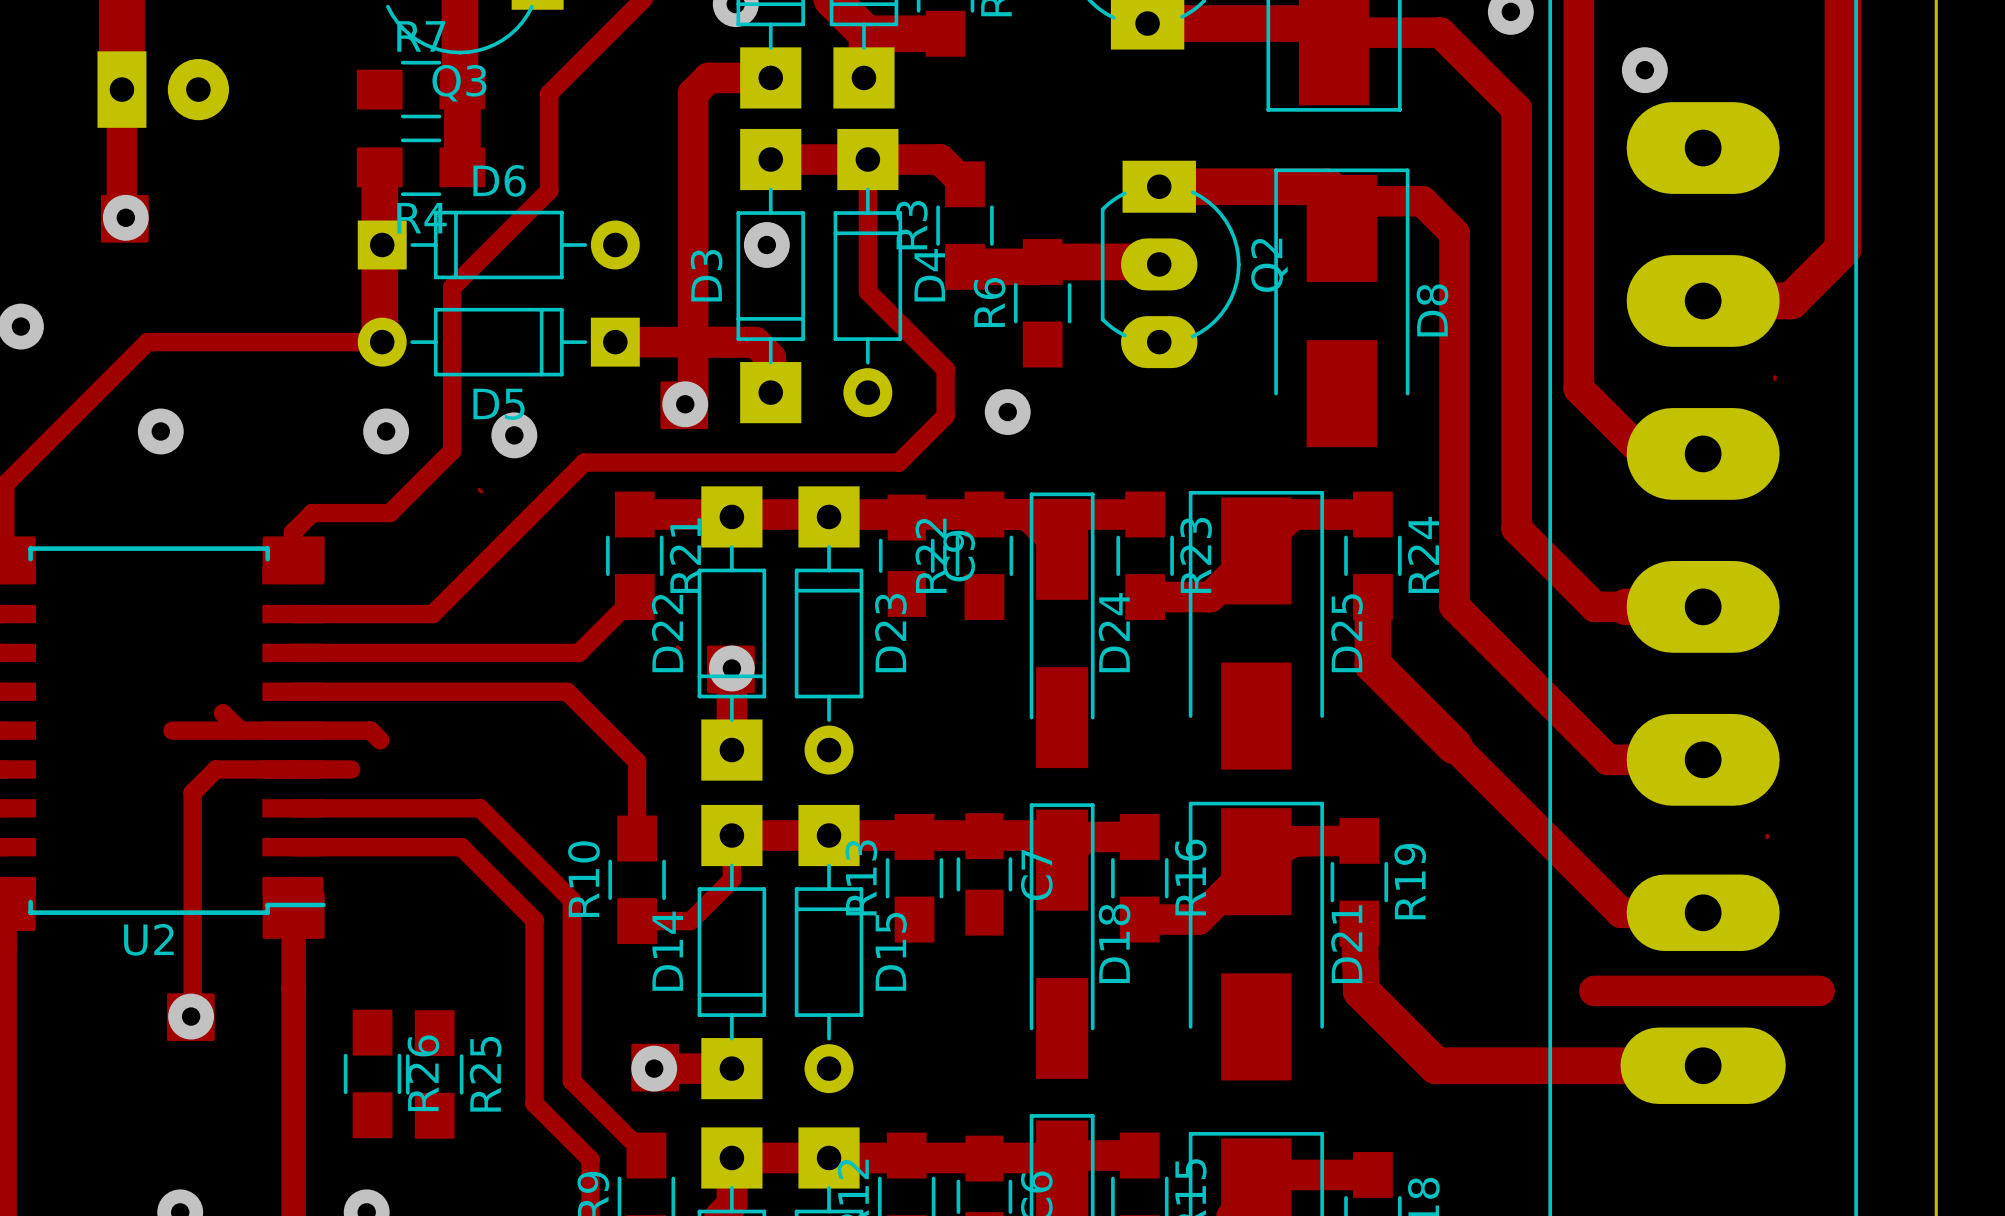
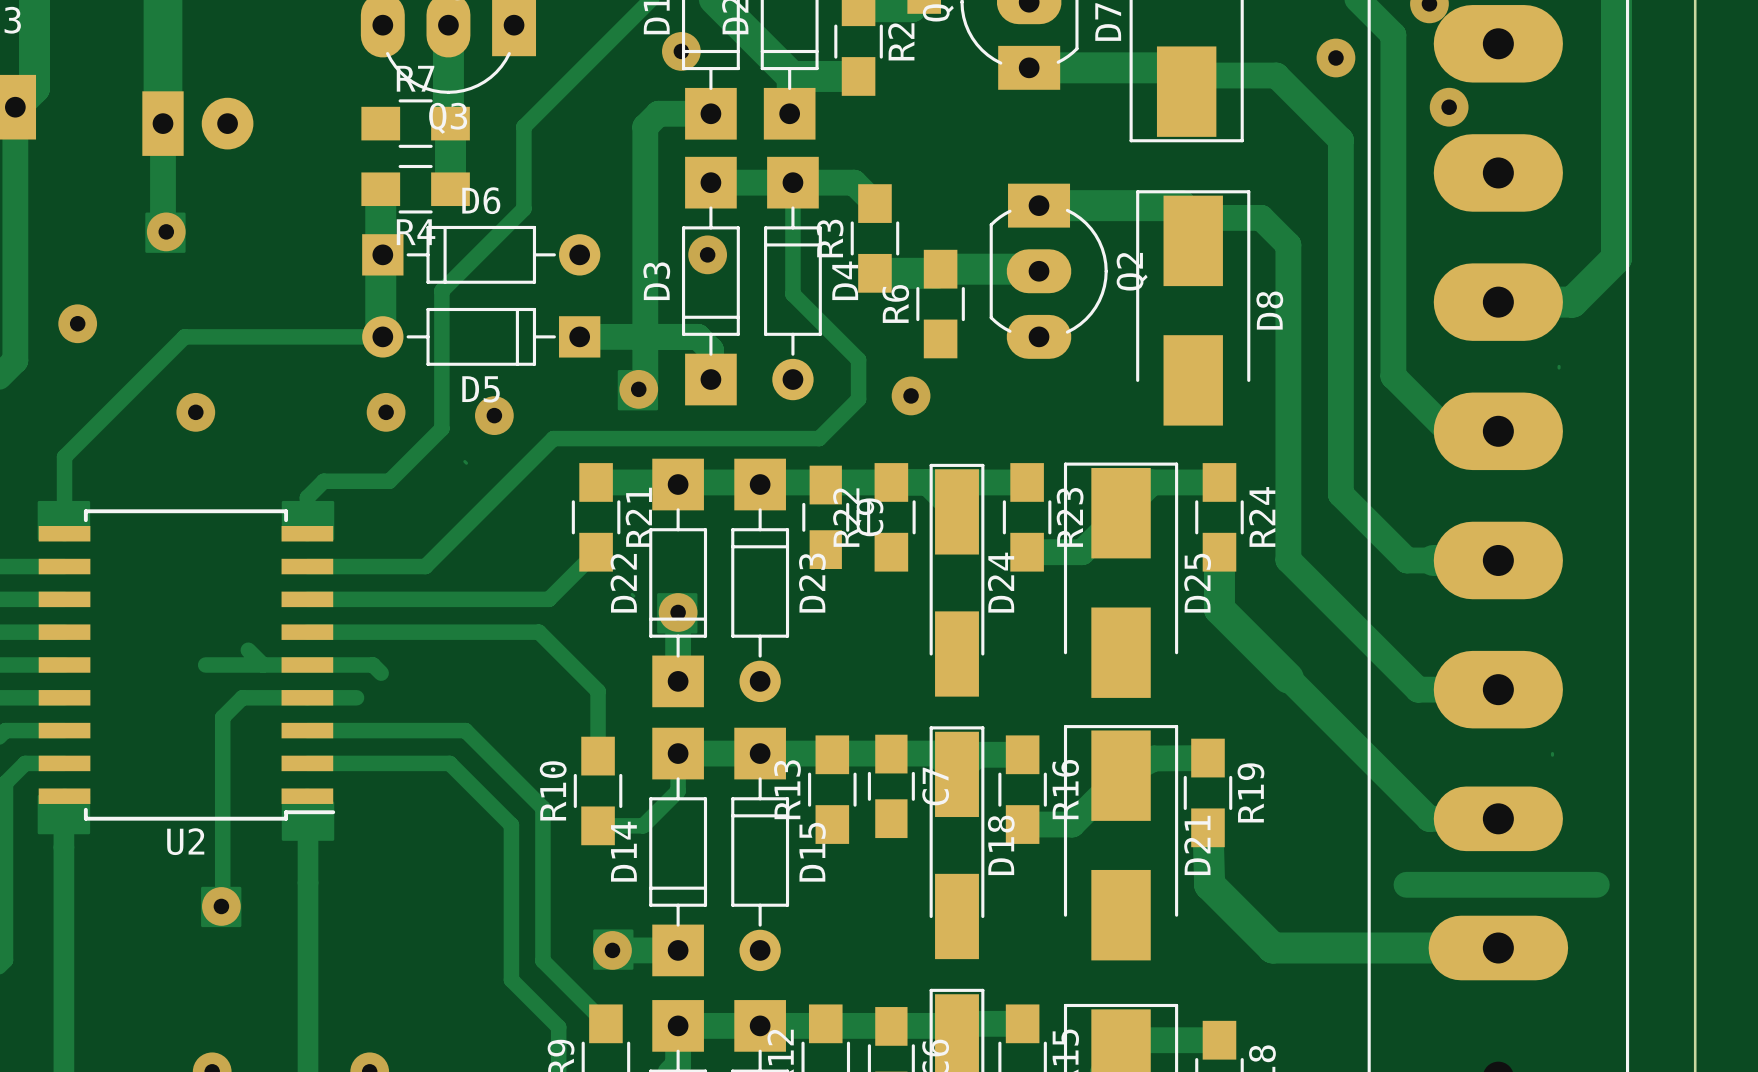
R26: (372, 1073) -> none
R25: (434, 1074) -> none

